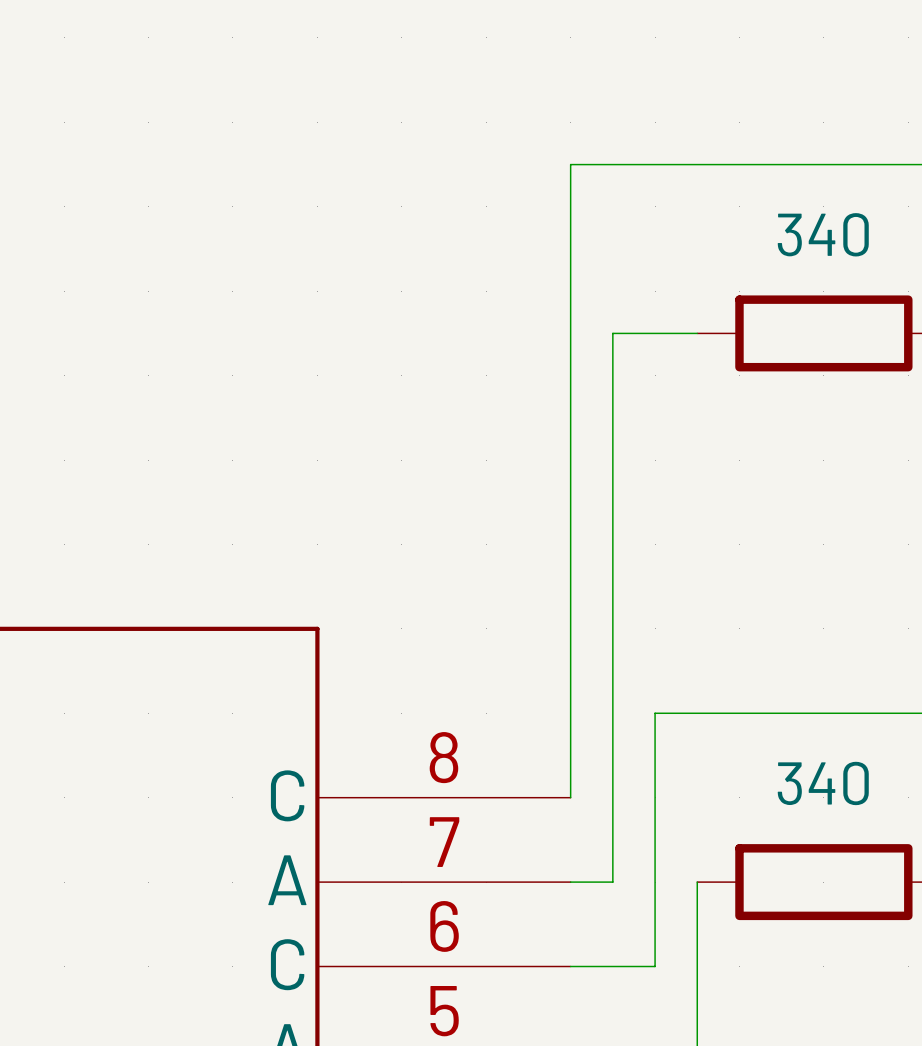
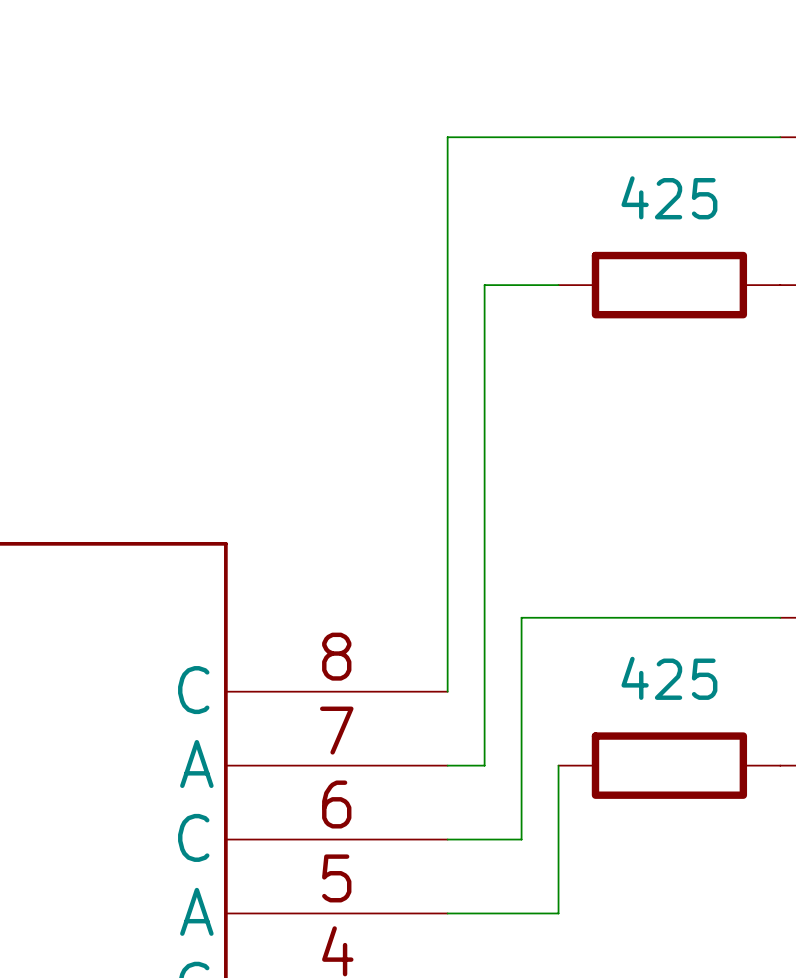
part value: 340 (823, 234) -> 425 (669, 197)
part value: 340 (823, 783) -> 425 (669, 678)

